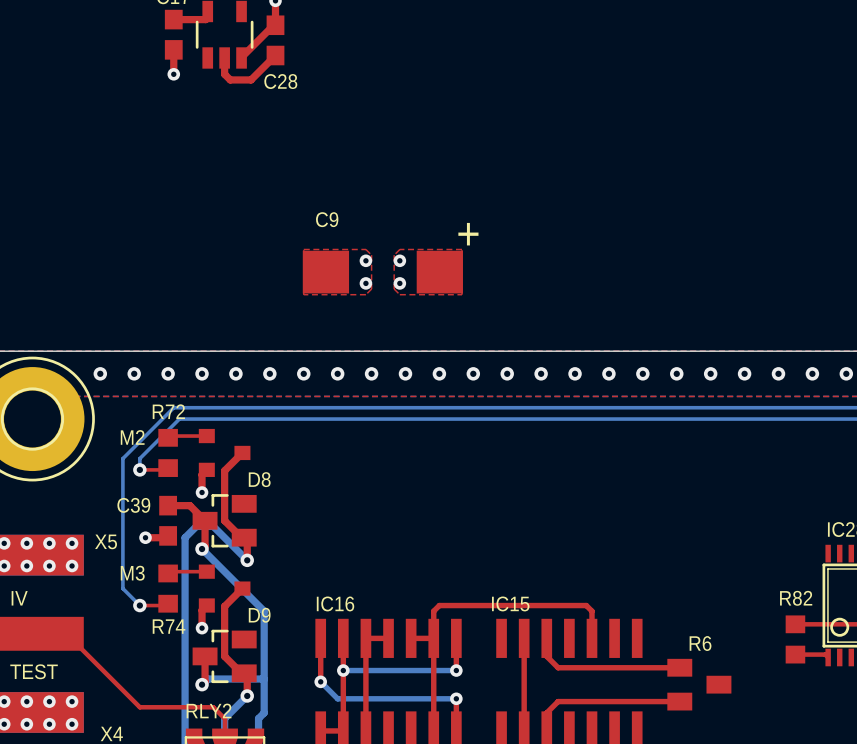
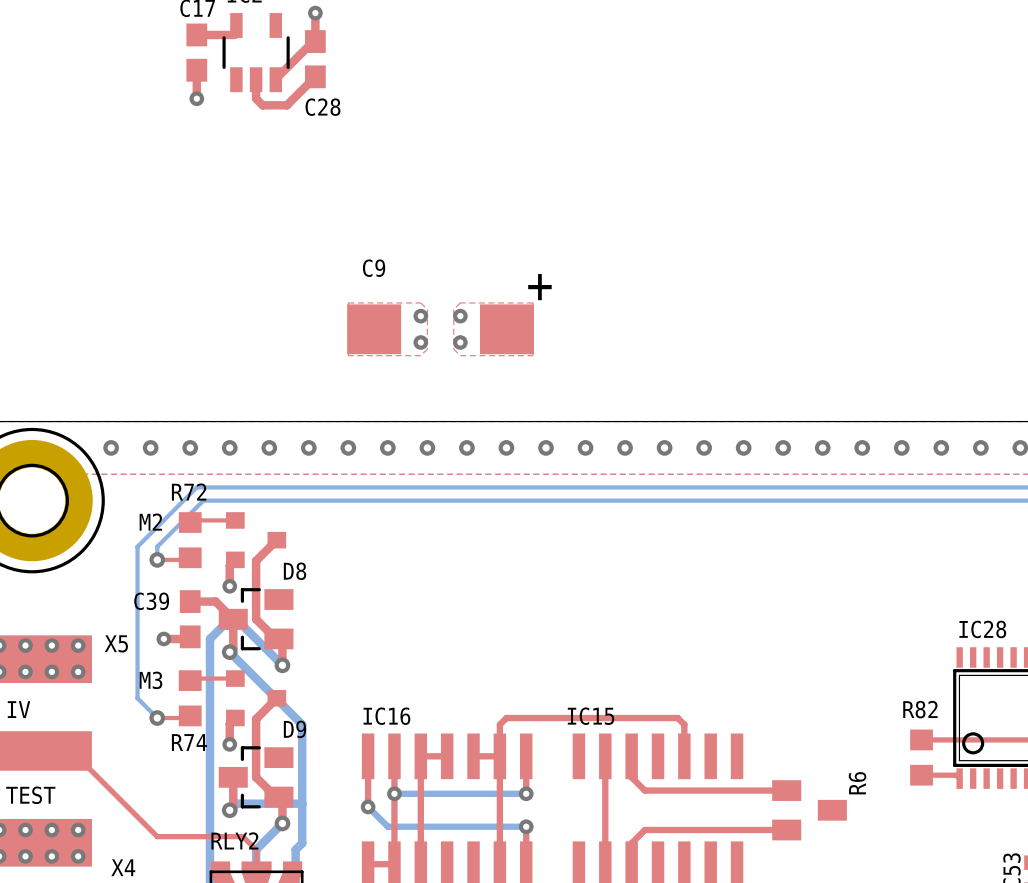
R6 name rotation: 0° (700, 643) -> 90° counterclockwise (857, 783)
R6 name position: R6 (700, 643) -> R6 (857, 783)

